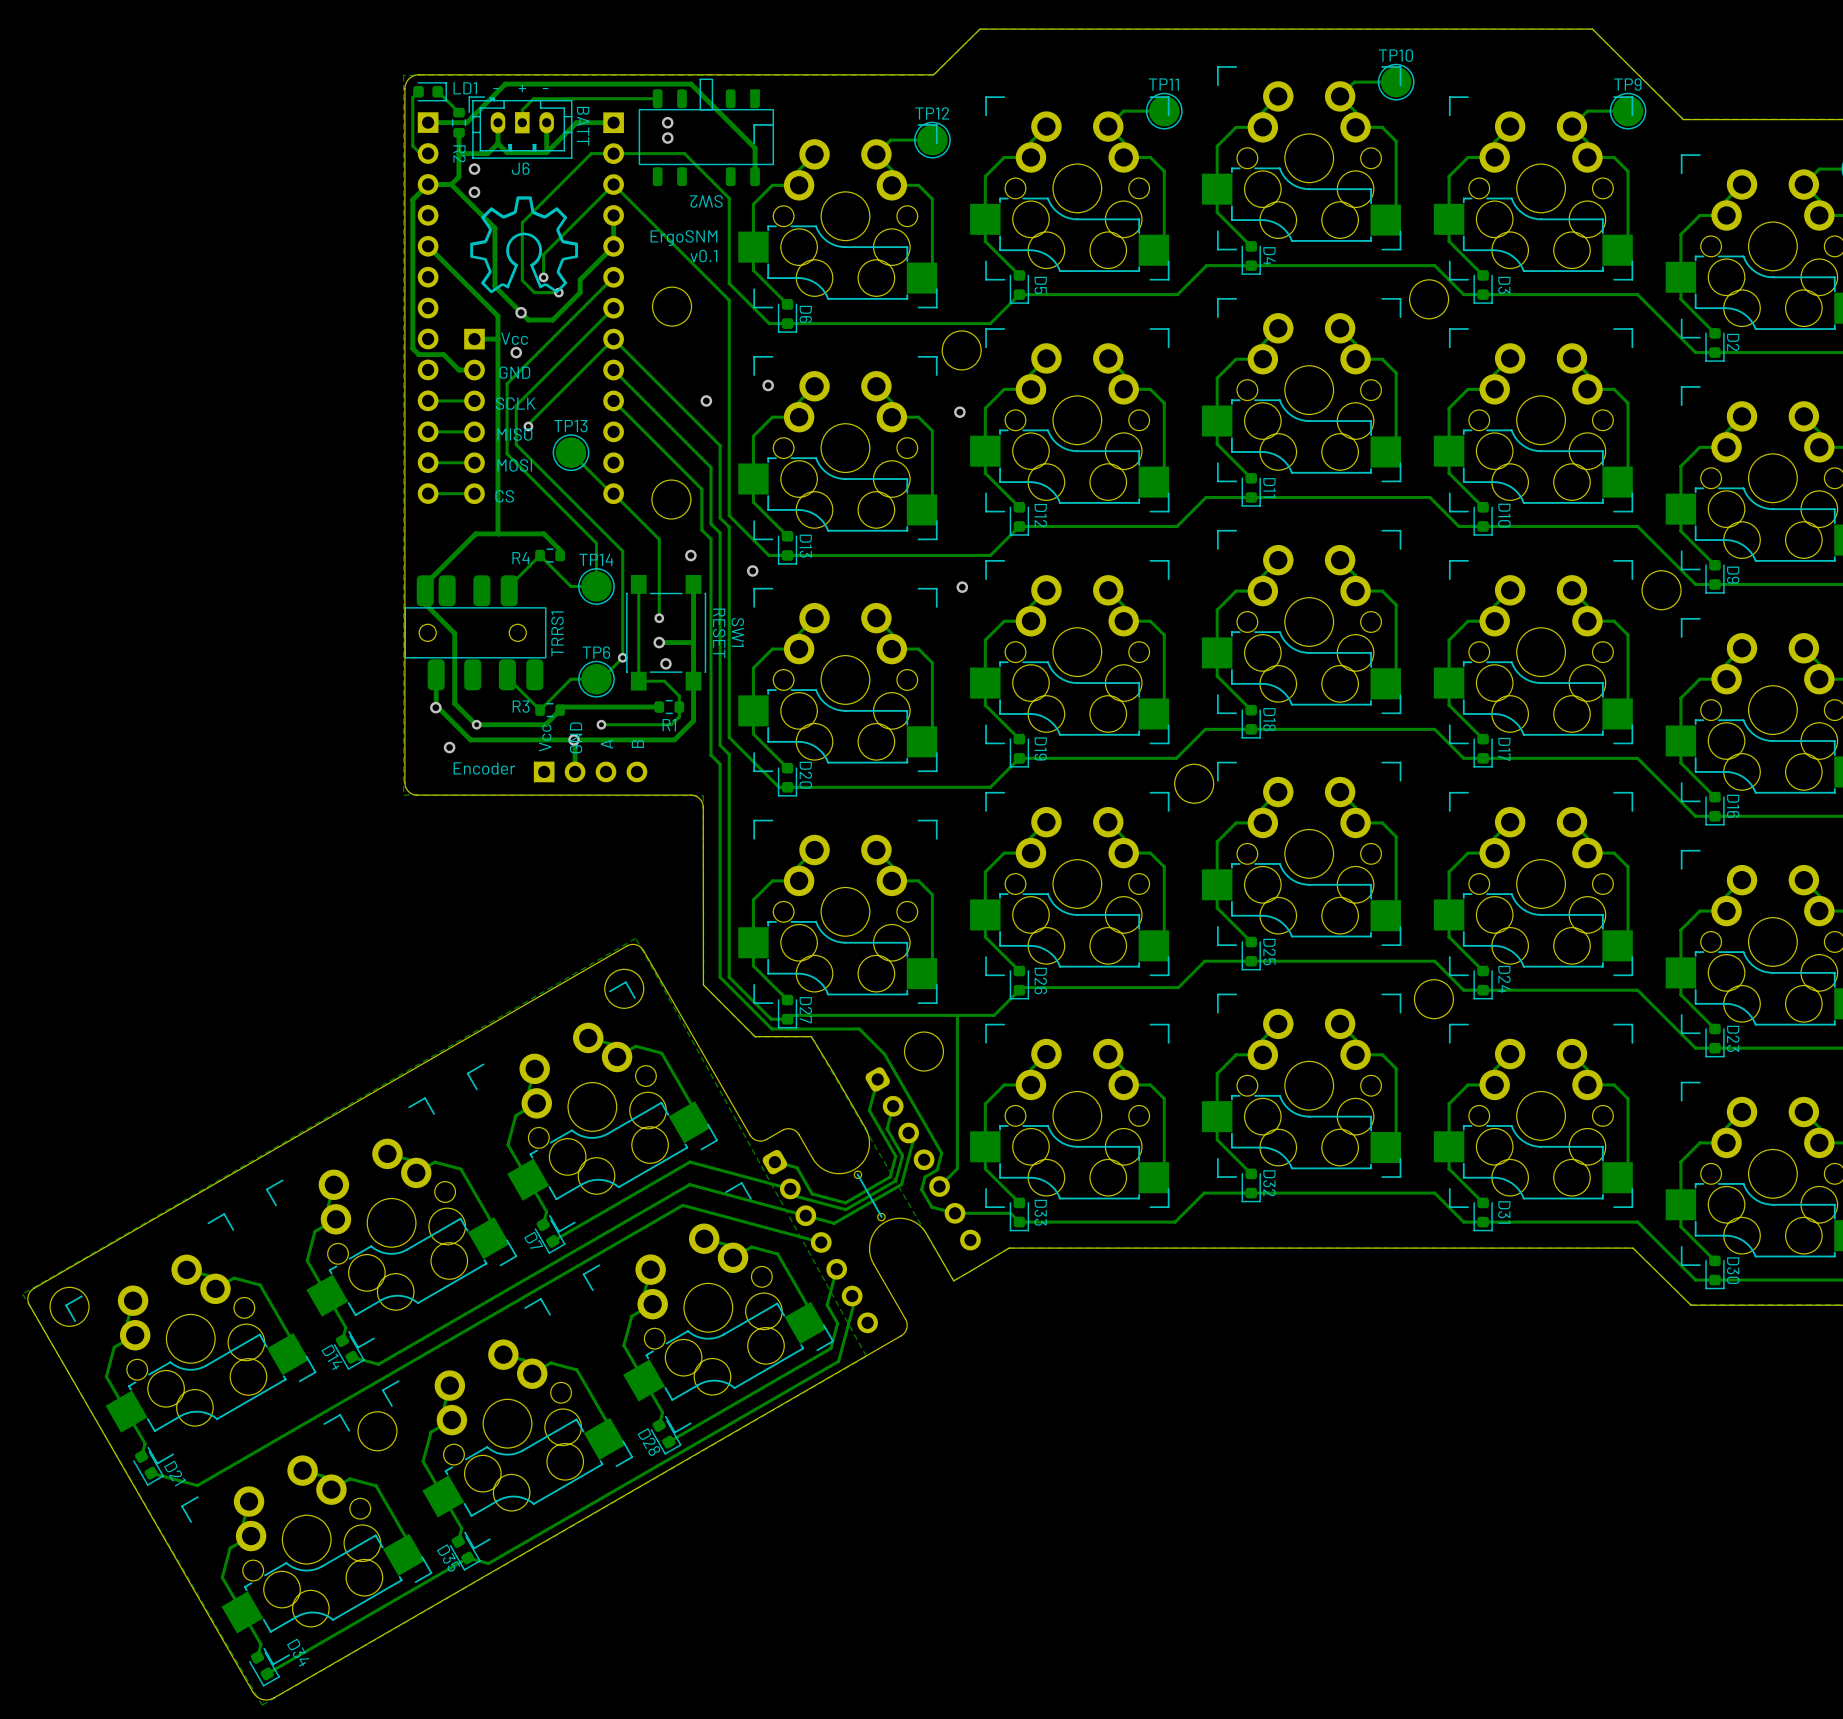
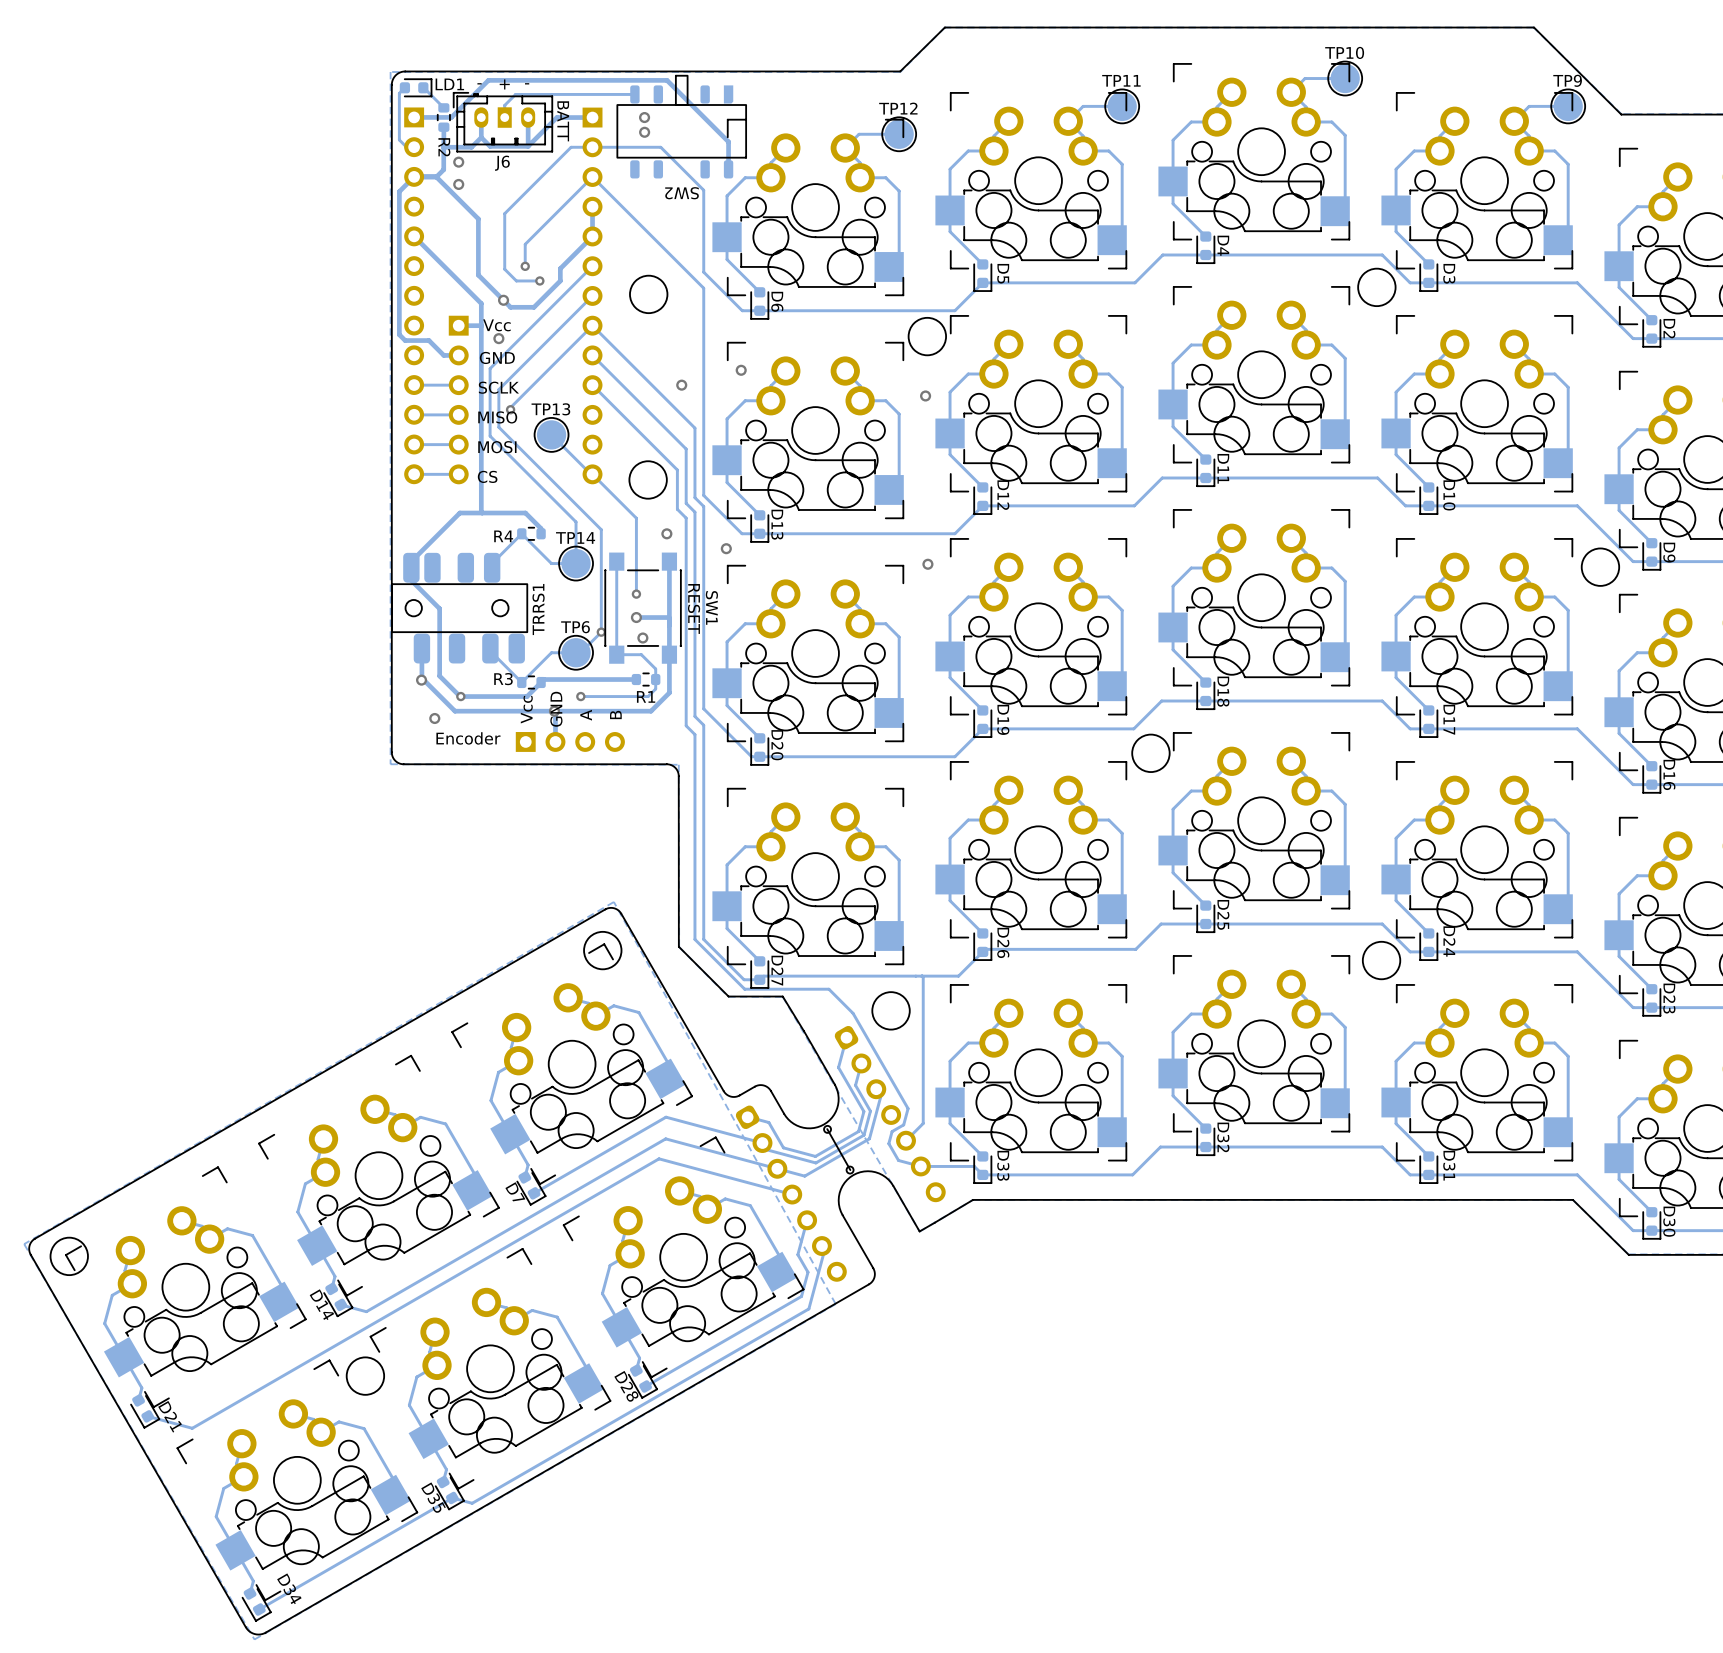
drawing: [470, 196, 579, 294] -> none
text: ErgoSNM (683, 238) -> none
text: v0.1 (703, 256) -> none

